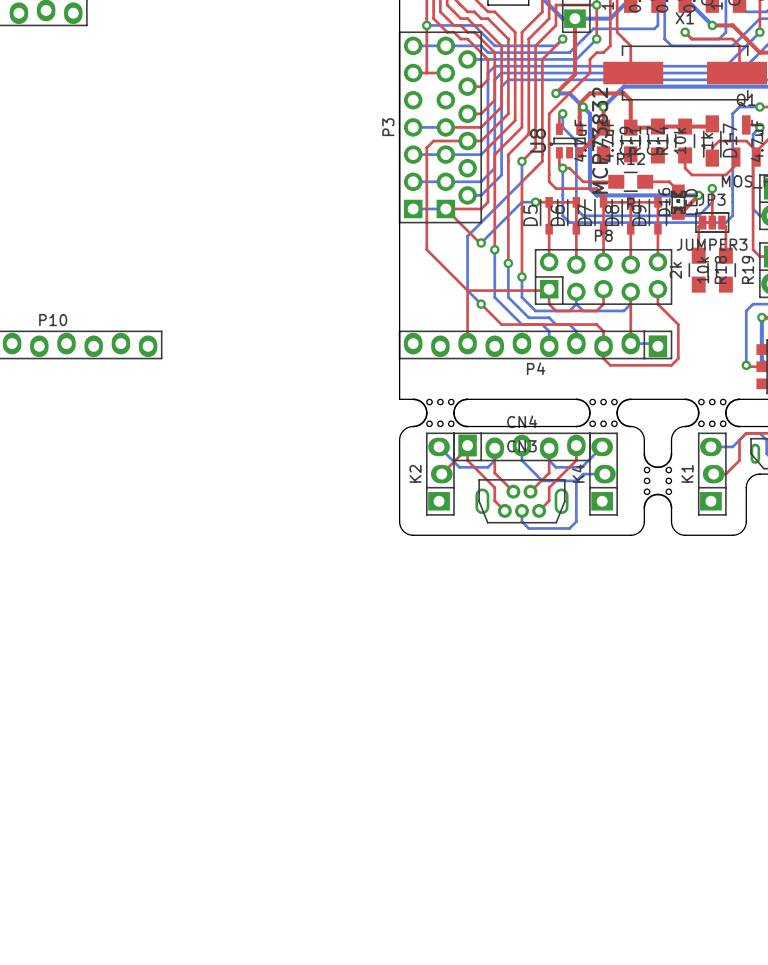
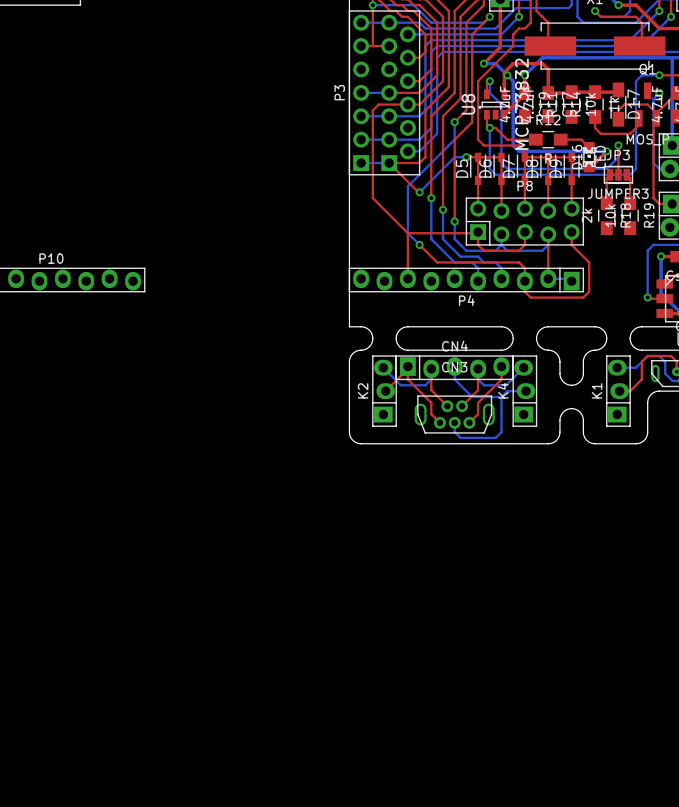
part: (440, 412) -> none
part: (603, 412) -> none
part: (712, 412) -> none
part: (657, 480) -> none

